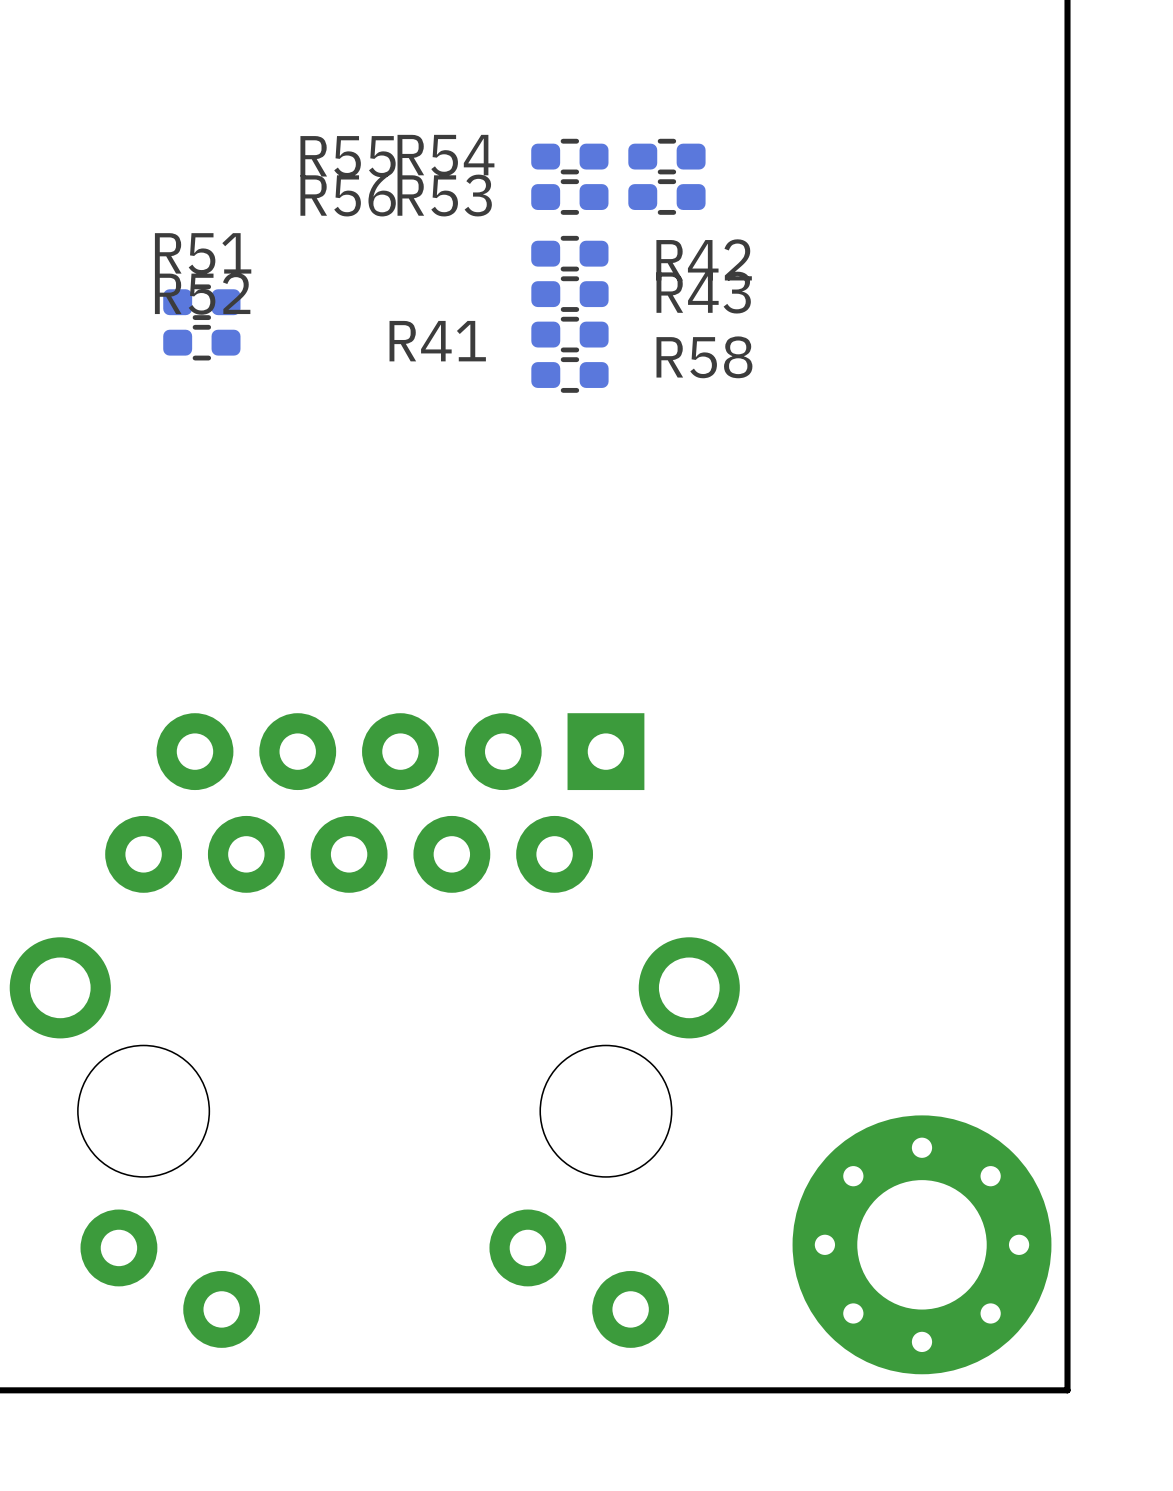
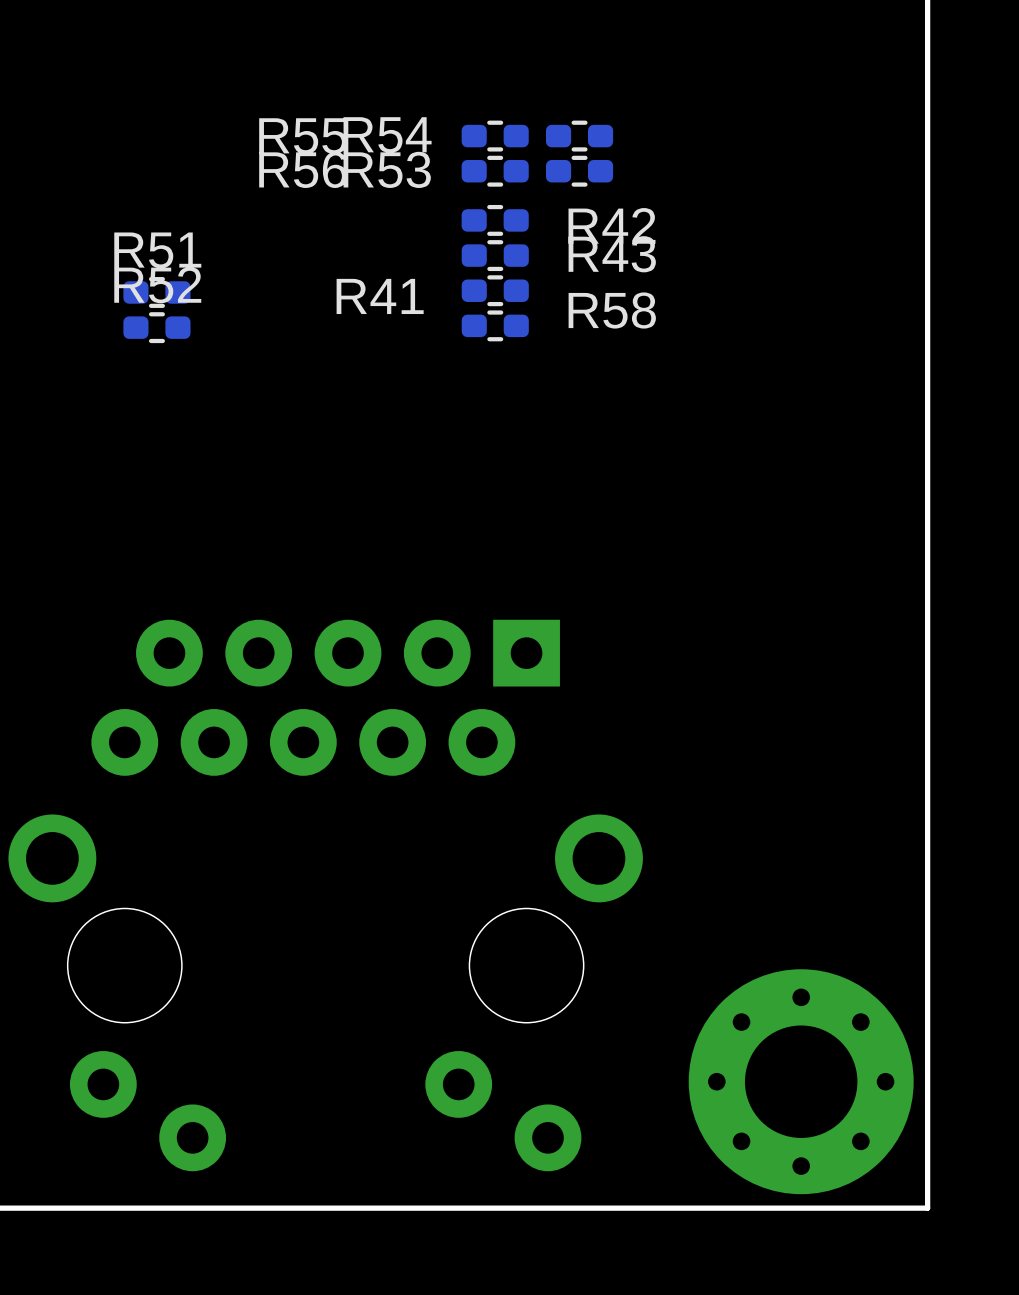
R51 position: (201, 302) -> (156, 292)
R52 position: (201, 342) -> (156, 327)

